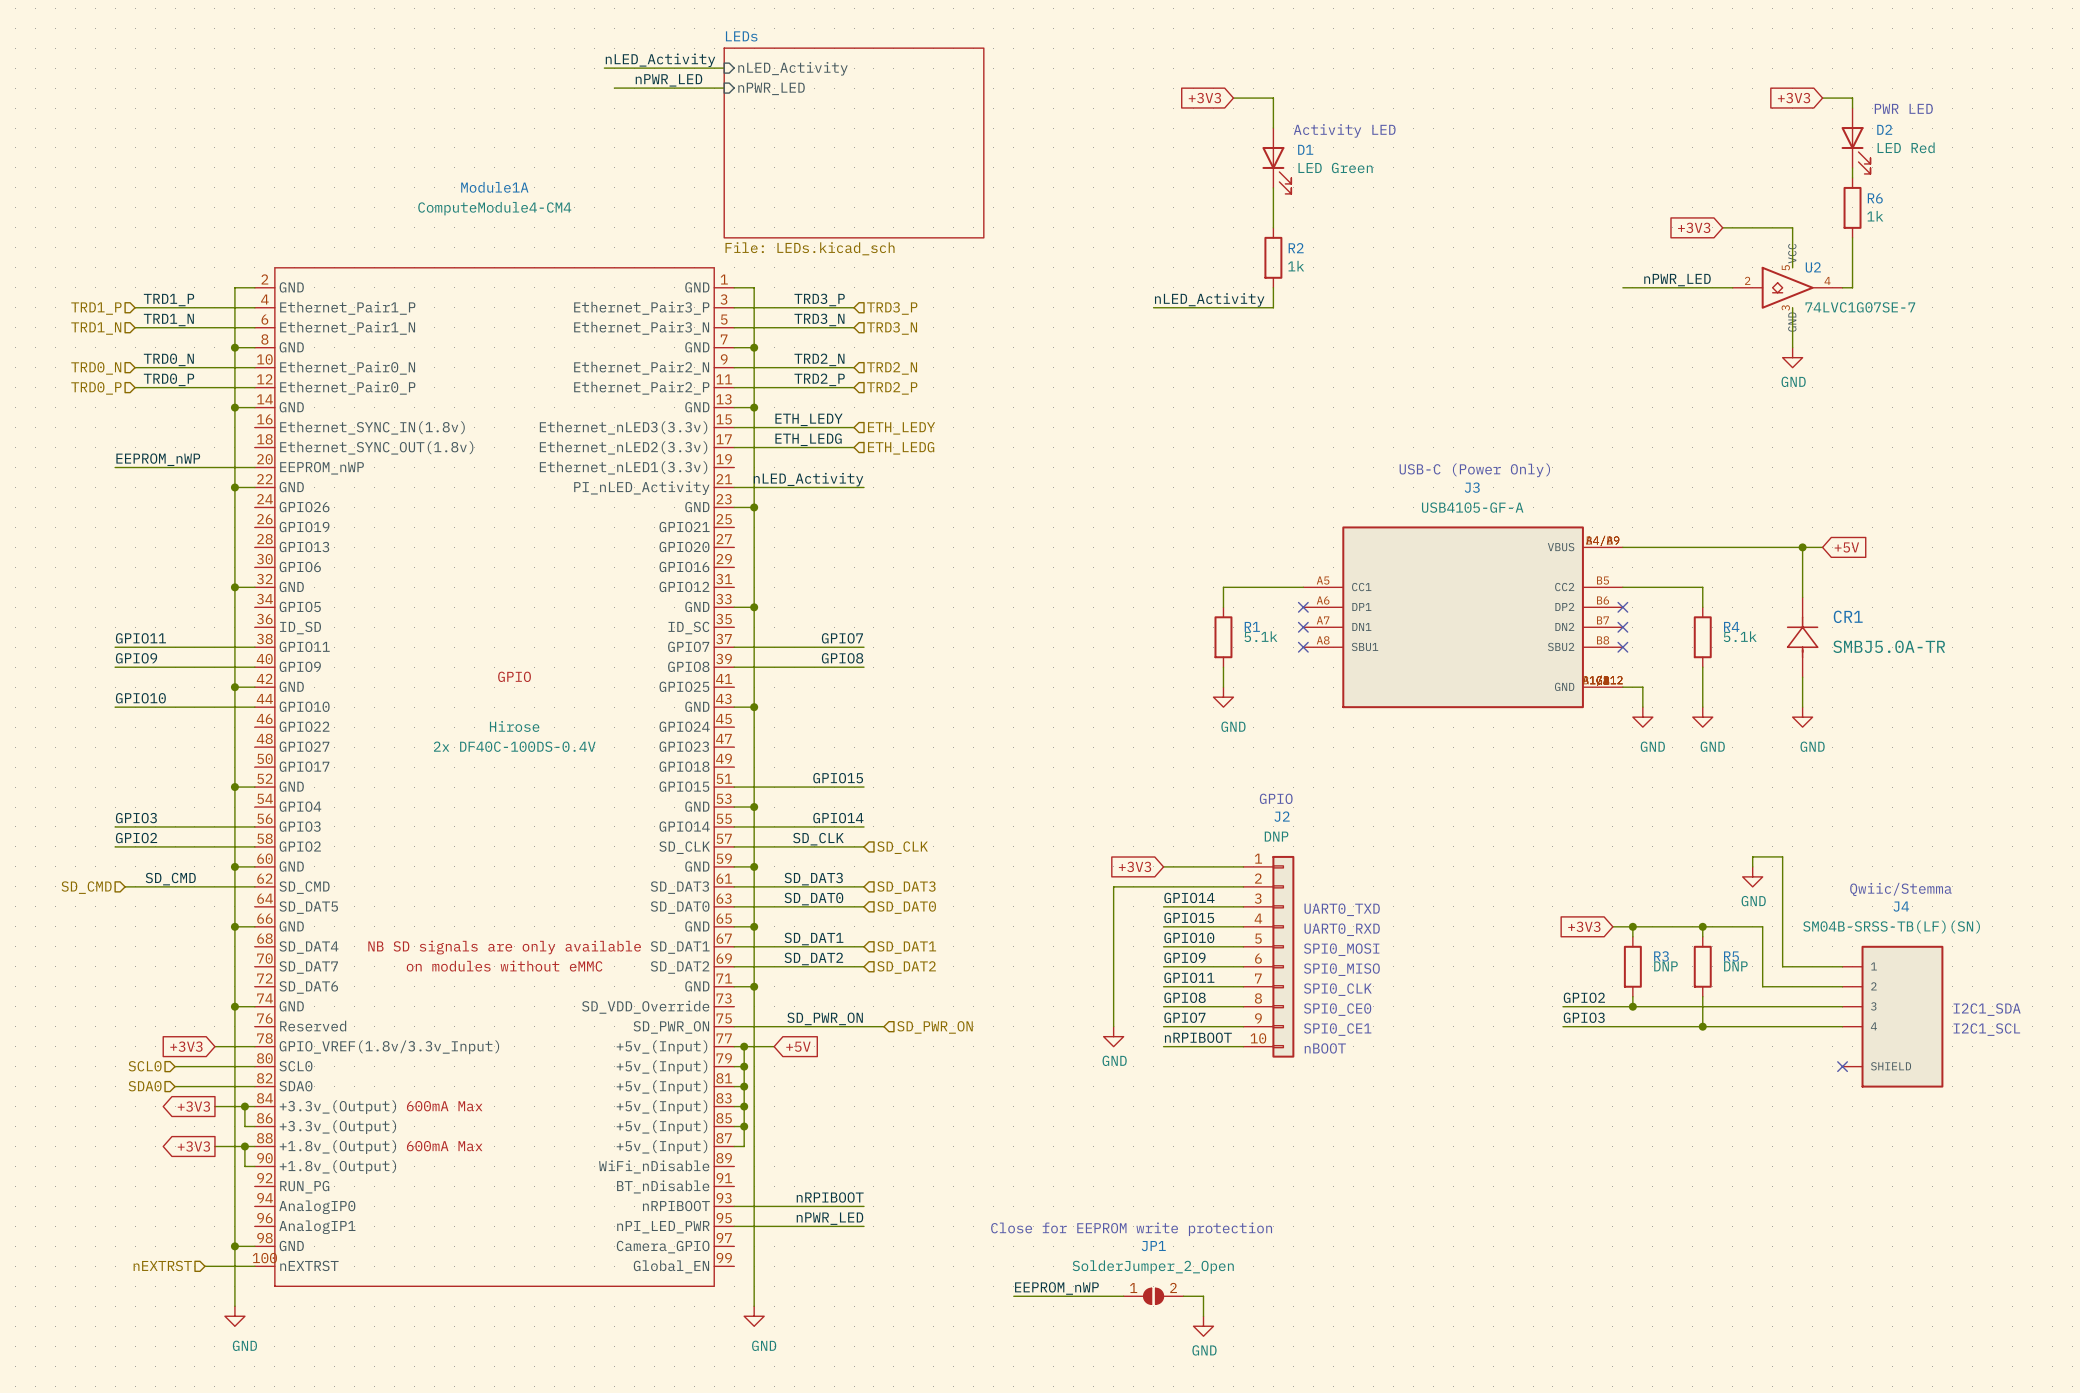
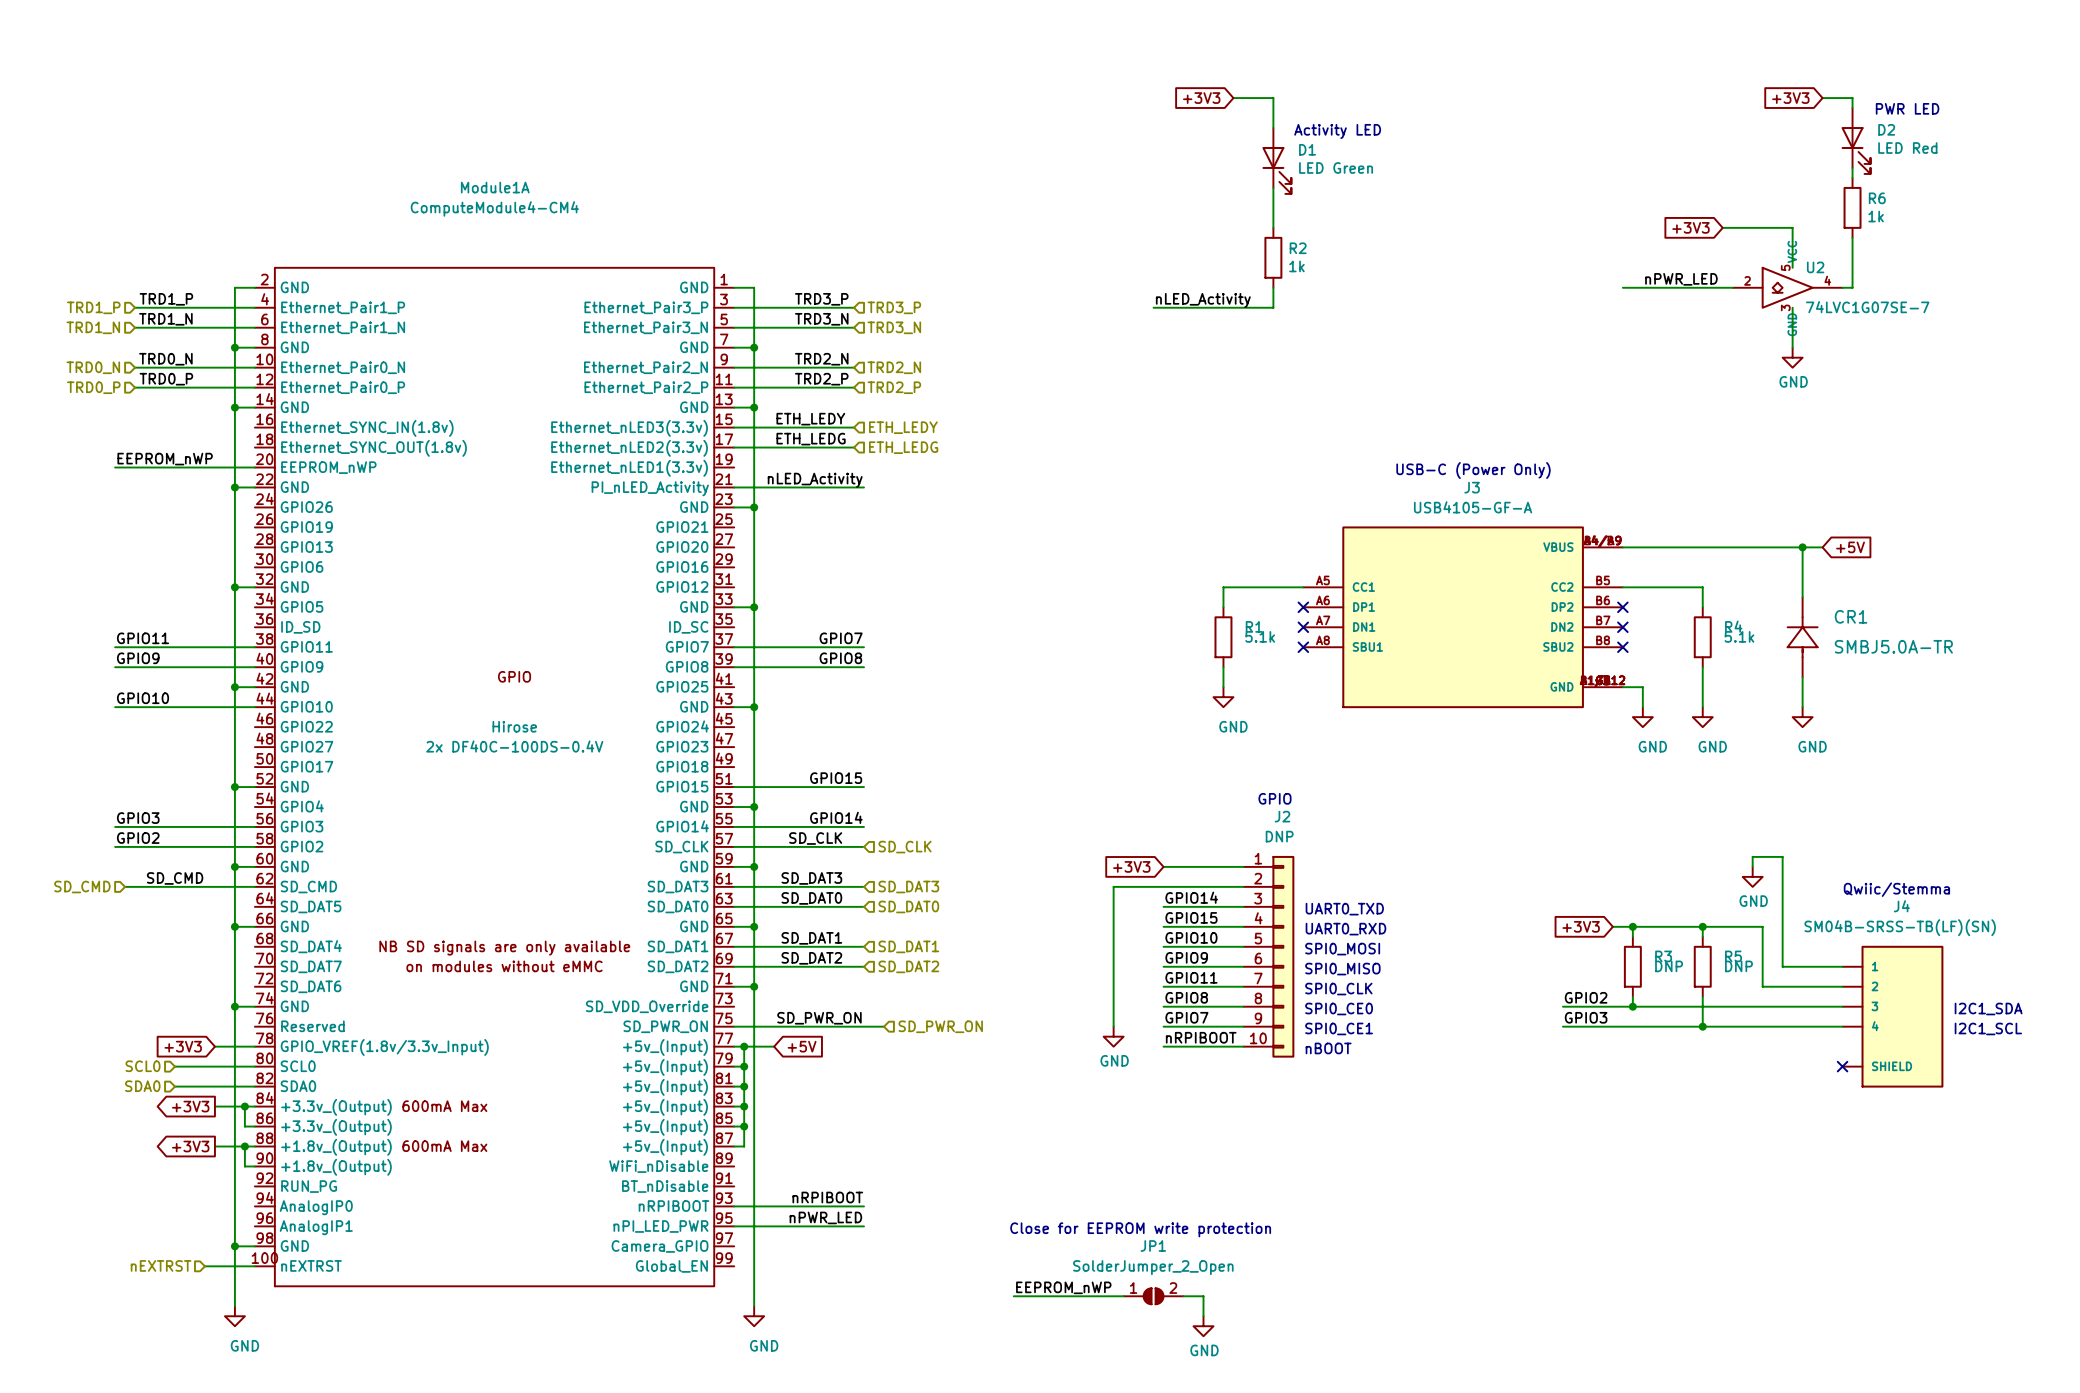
label: nLED_Activity (660, 60) -> none
wire: (604, 68) (724, 68) -> none
sheet pin: nLED_Activity (793, 68) -> none
label: nPWR_LED (668, 80) -> none
wire: (614, 88) (724, 88) -> none
sheet pin: nPWR_LED (771, 88) -> none
sheet LEDs: File: LEDs.kicad_sch (854, 142) -> none

